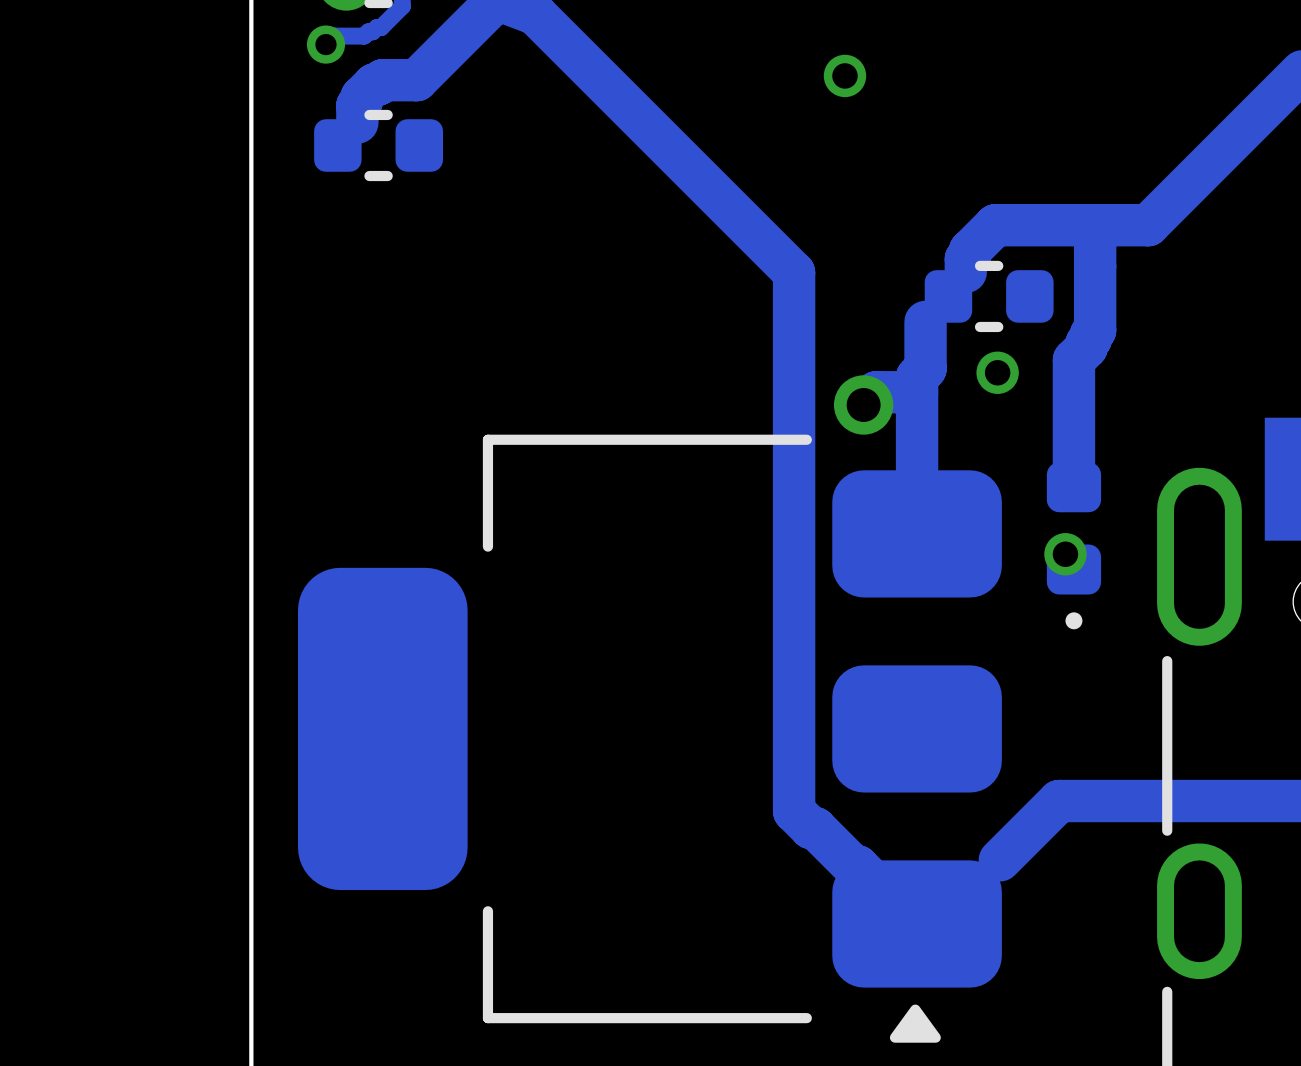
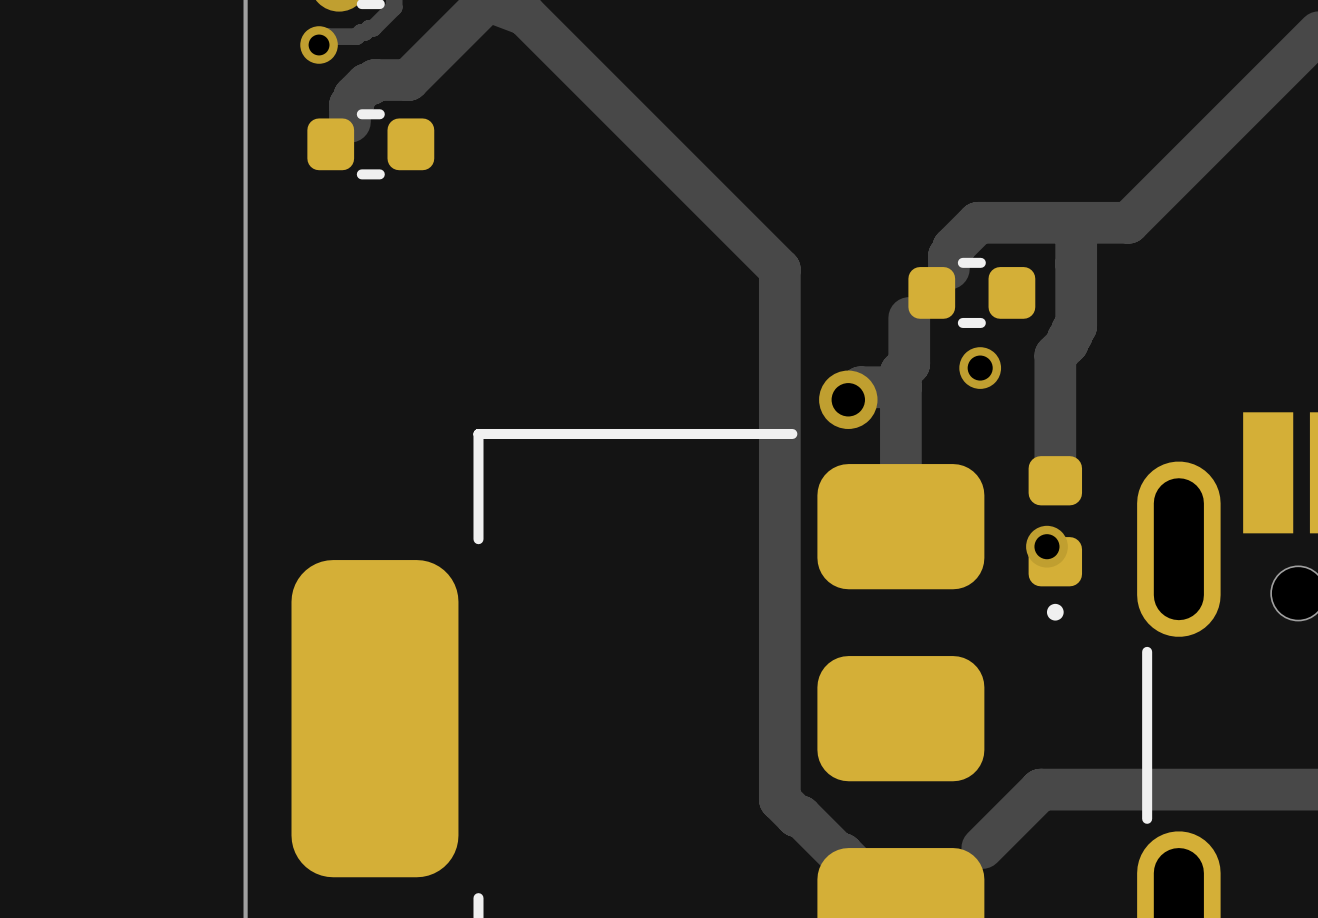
via: (844, 75) -> none

